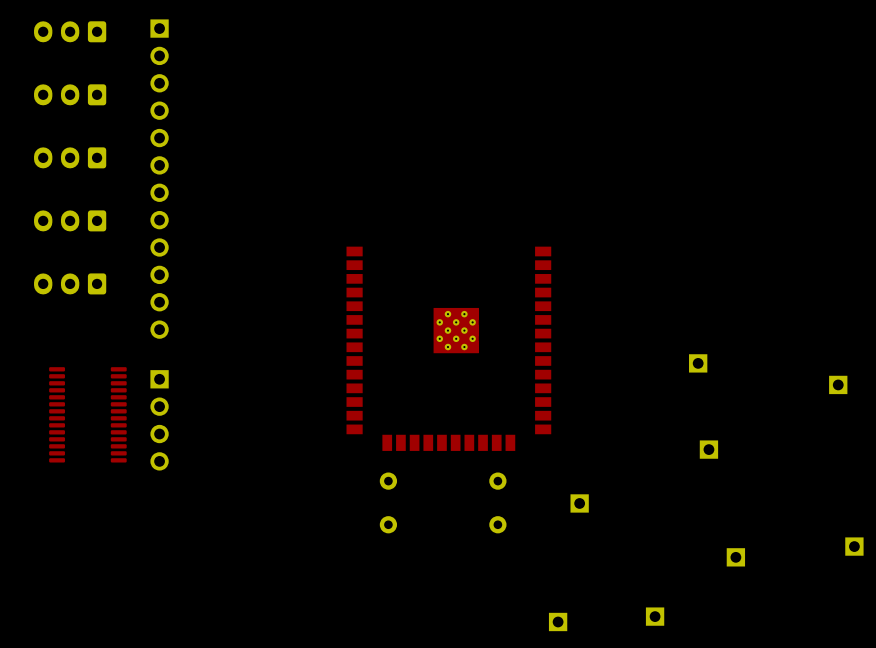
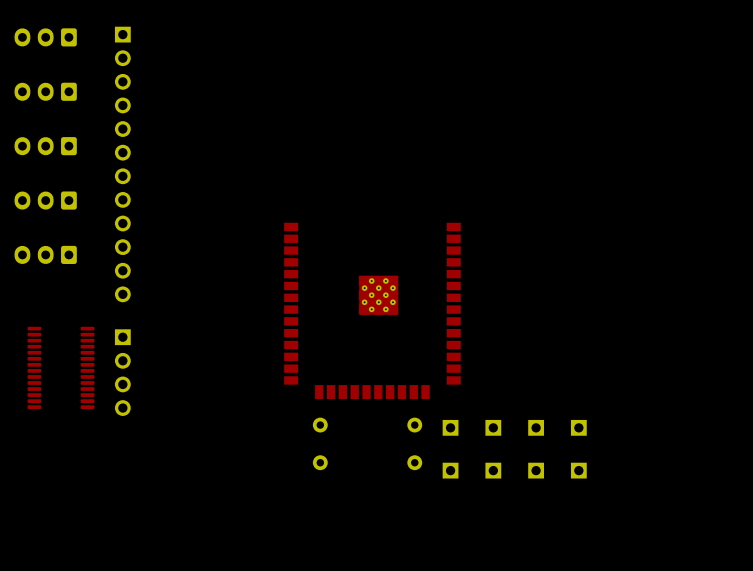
part: (698, 363) -> none
part: (838, 384) -> none
part: (708, 449) -> none
part: none -> (450, 427)
part: none -> (493, 427)
part: none -> (536, 427)
part: none -> (578, 427)
part: (579, 503) -> none
part: none -> (450, 470)
part: none -> (493, 470)
part: none -> (536, 470)
part: none -> (578, 470)
part: (854, 546) -> none
part: (735, 557) -> none
part: (655, 616) -> none
part: (558, 621) -> none

